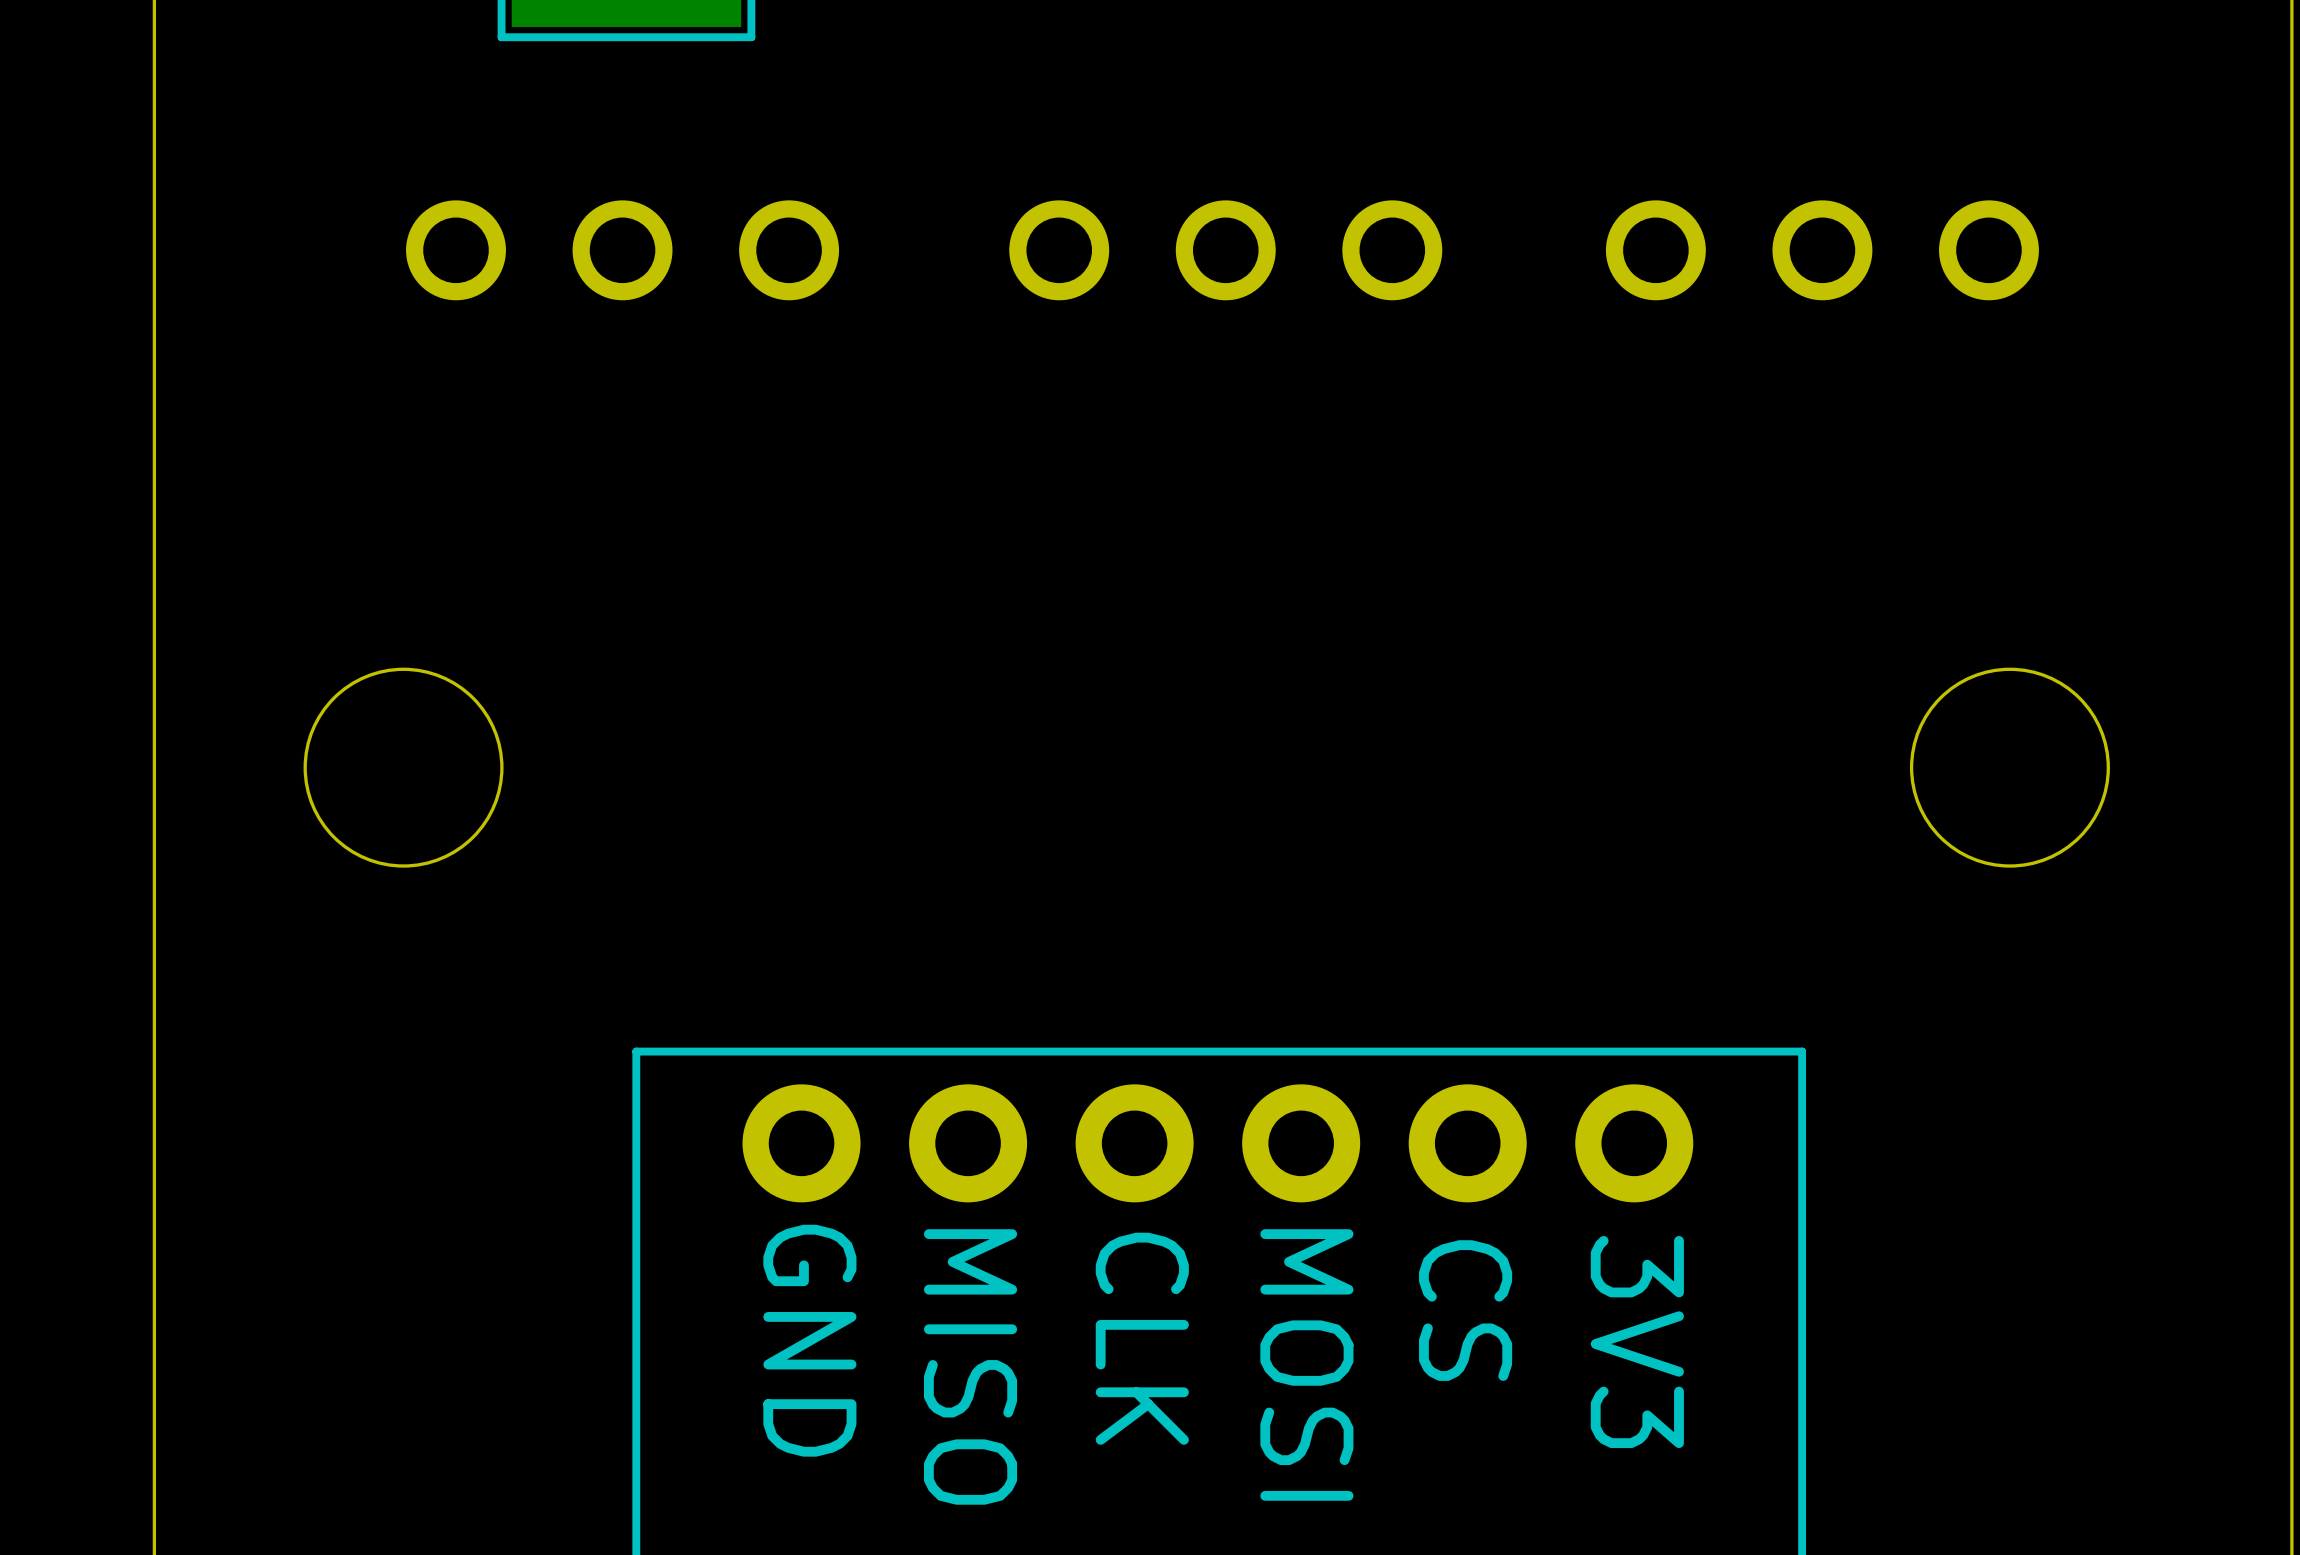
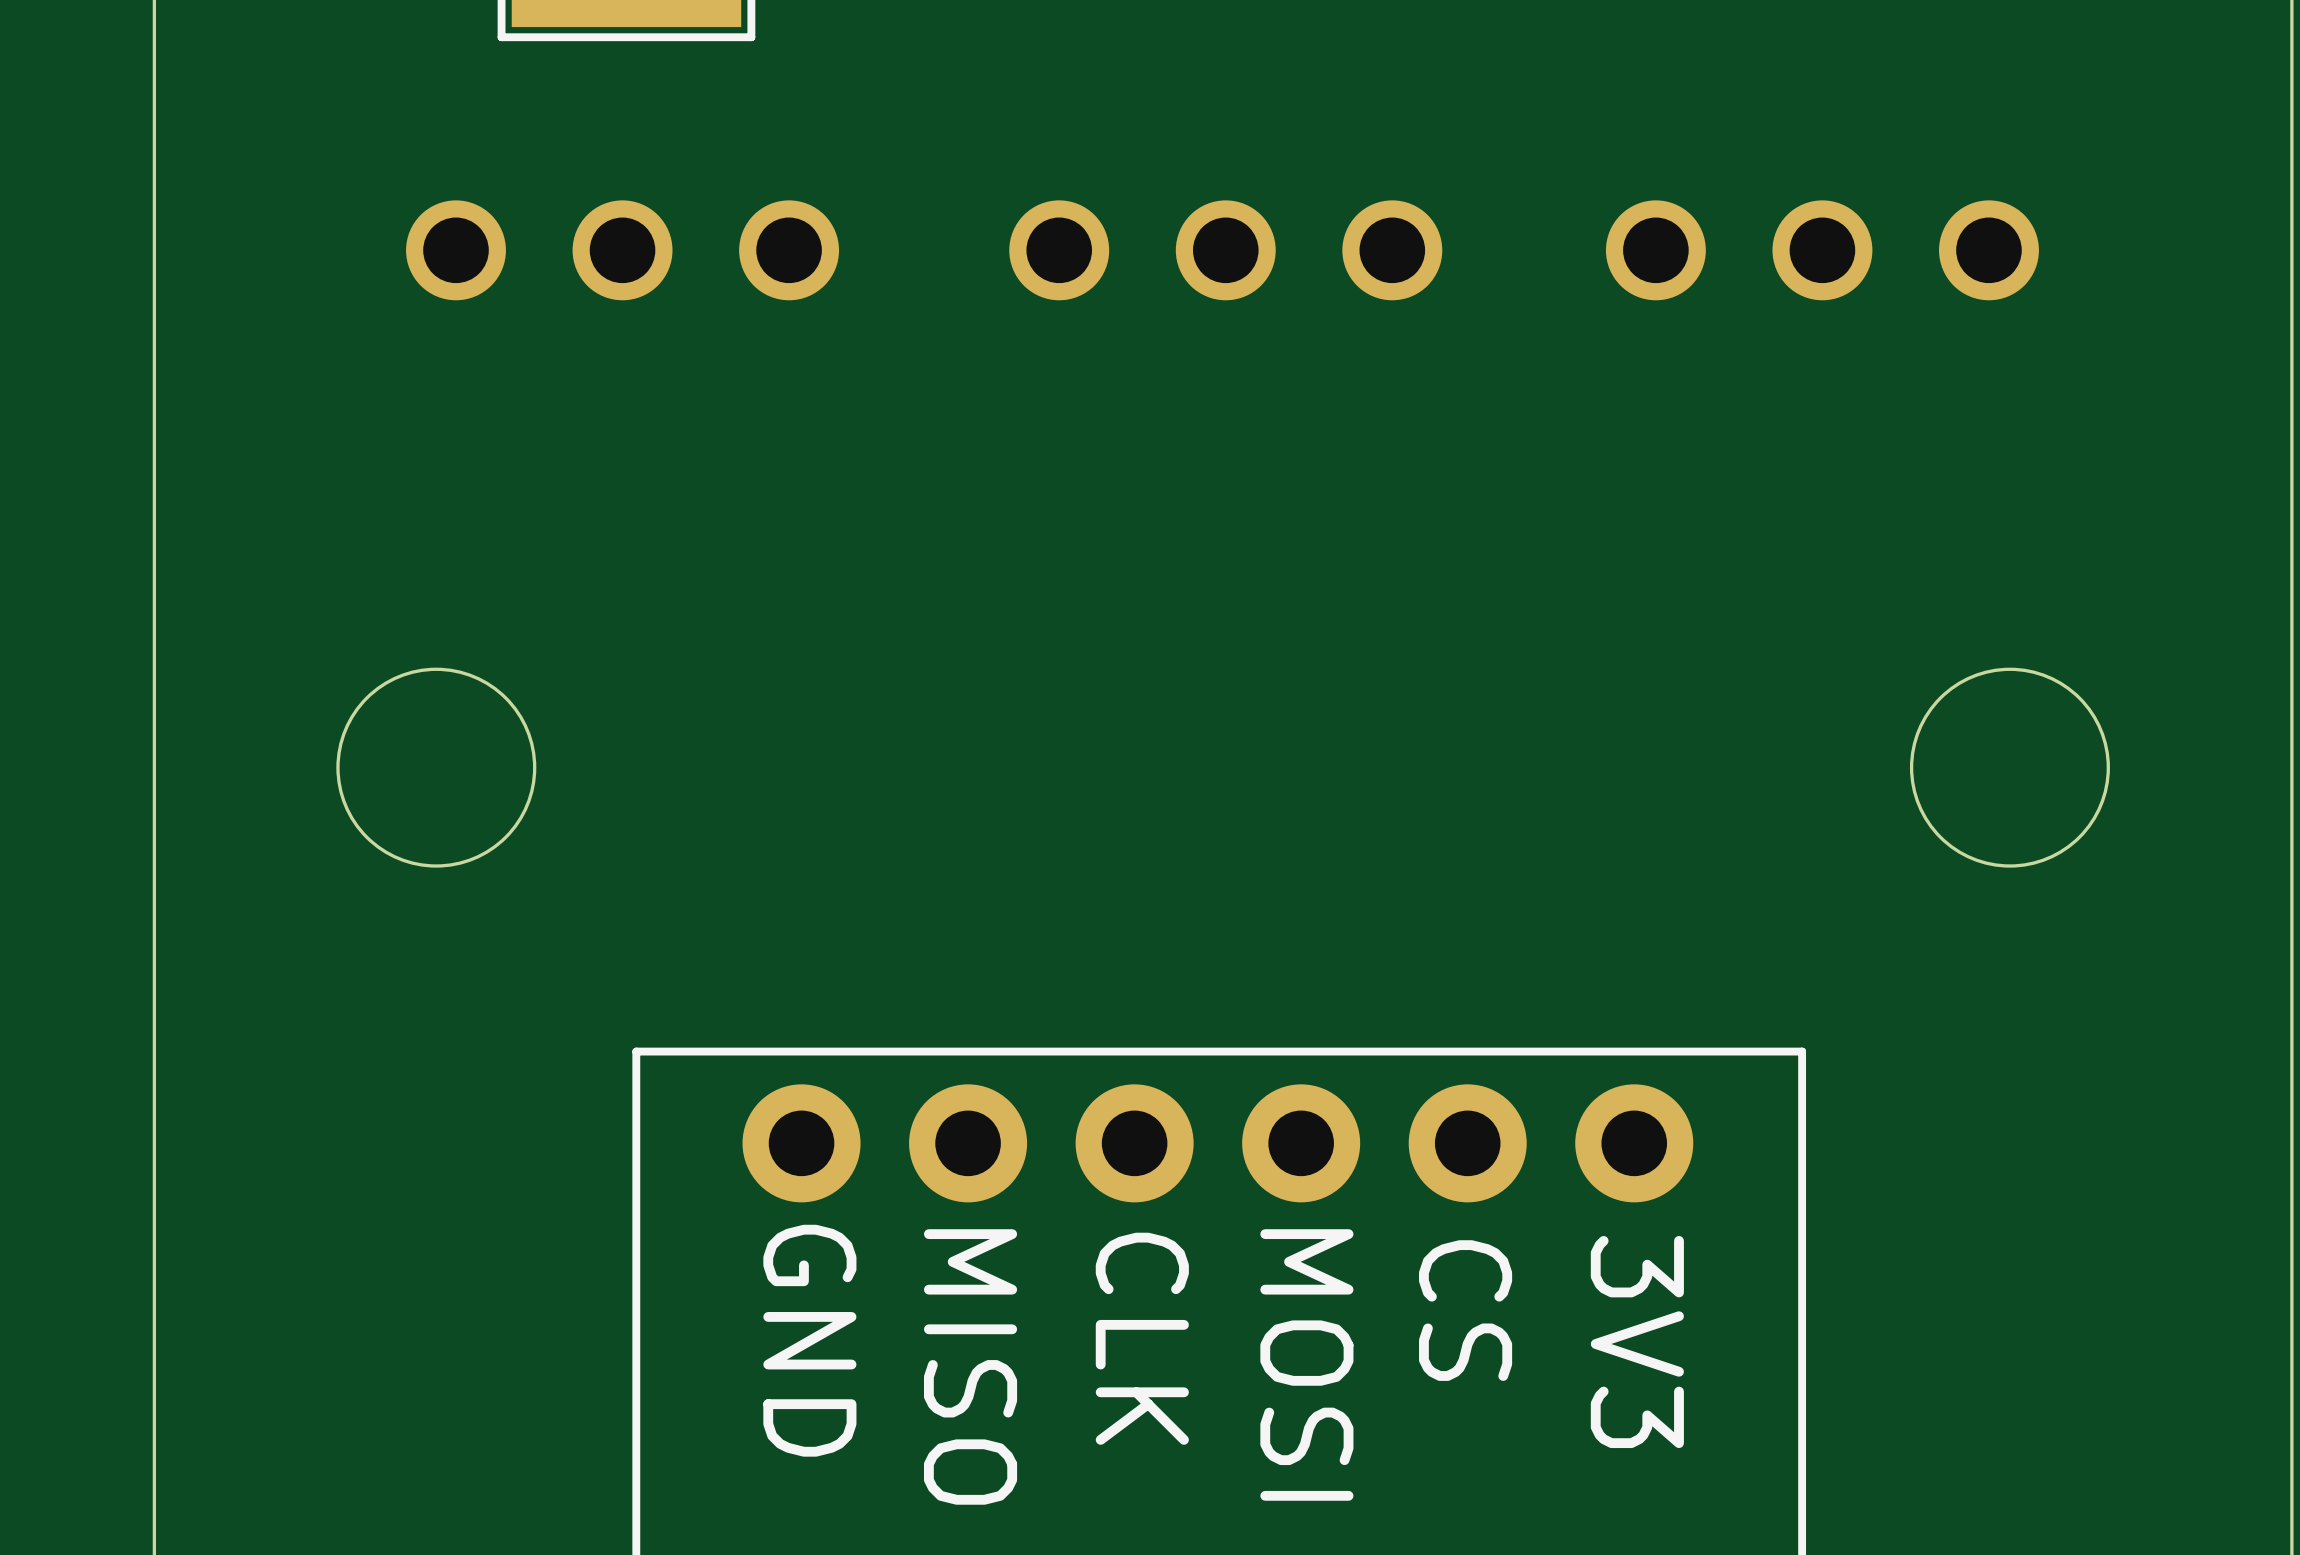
round board edge position: (403, 767) -> (436, 767)

